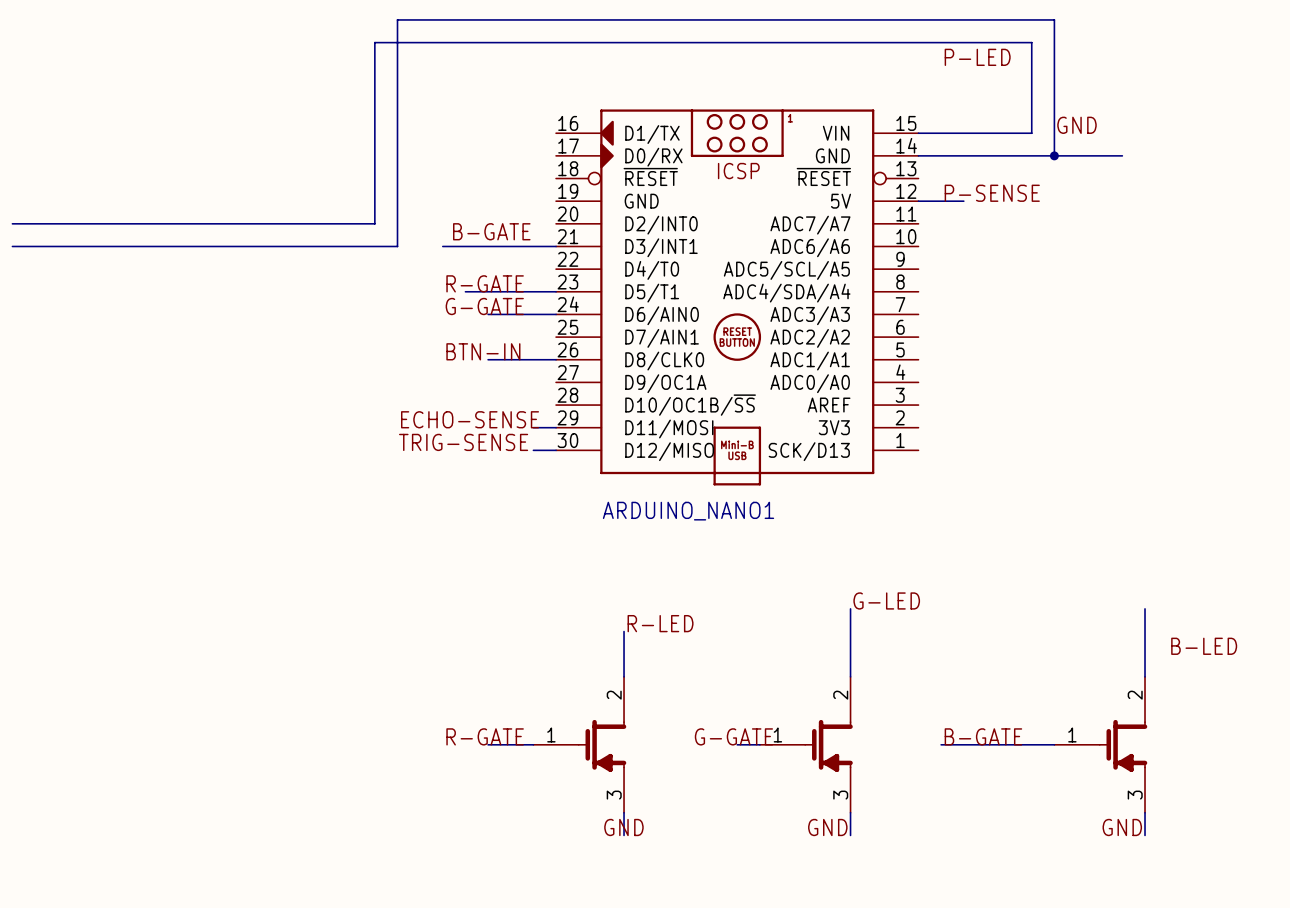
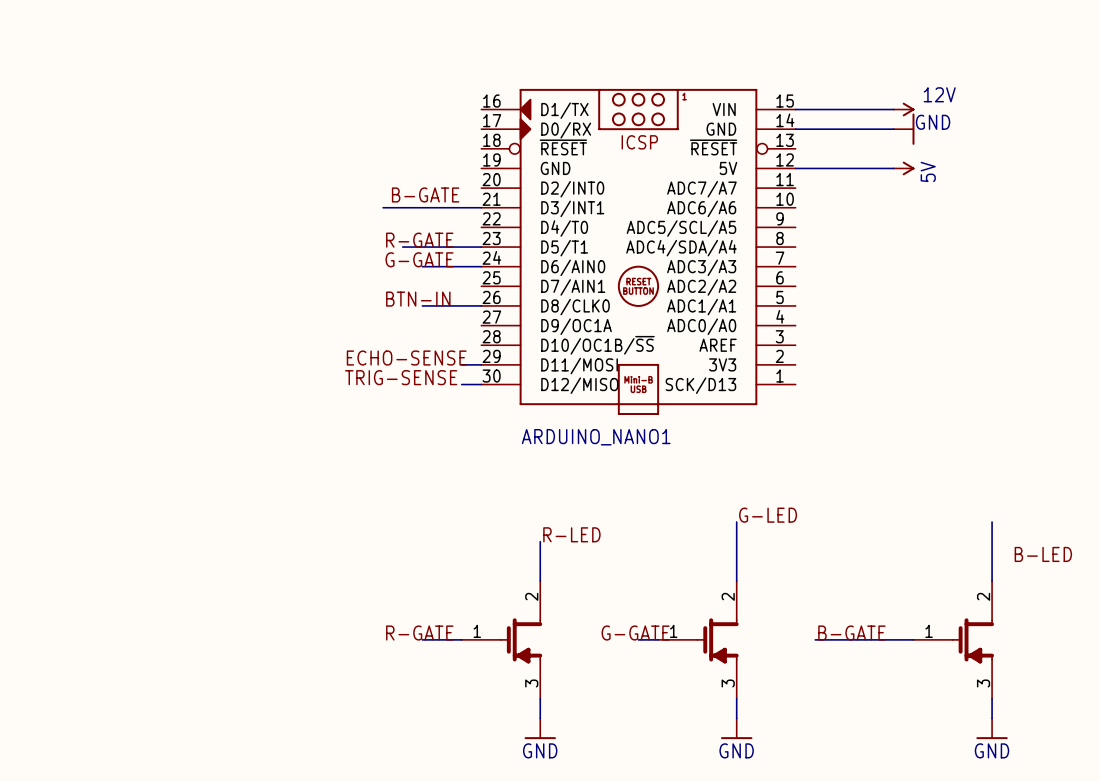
label: P-LED (977, 57) -> none
label: GND (1076, 125) -> none
wire: (1031, 133) (1031, 42) (374, 42) (374, 223) (12, 223) -> none
power symbol: none -> 12V (904, 109)
wire: (1031, 155) (1122, 155) -> none
power symbol: none -> GND (904, 129)
wire: (1054, 155) (1054, 19) (397, 19) (397, 246) (12, 246) -> none
junction: (1054, 155) -> none
label: P-SENSE (992, 193) -> none
wire: none -> (834, 168) (893, 168)
power symbol: none -> 5V (904, 168)
label: GND (623, 827) -> none
label: GND (827, 827) -> none
label: GND (1122, 827) -> none
power symbol: none -> GND (540, 728)
power symbol: none -> GND (736, 728)
power symbol: none -> GND (992, 728)

